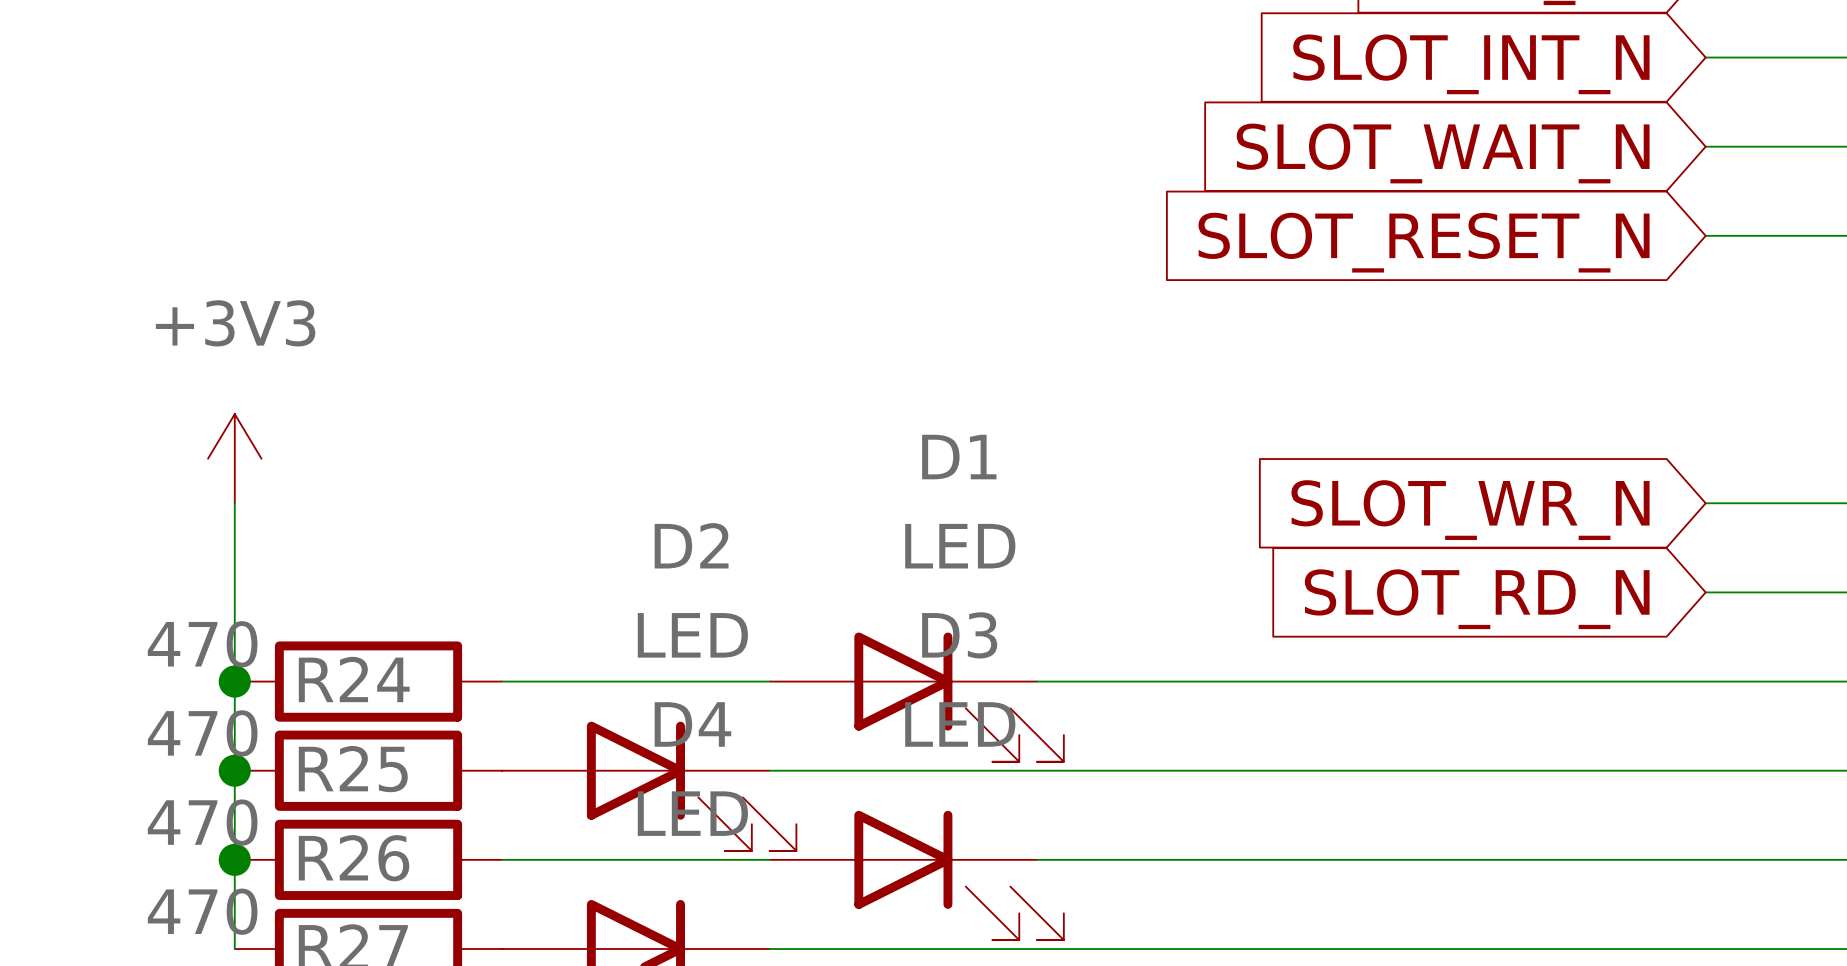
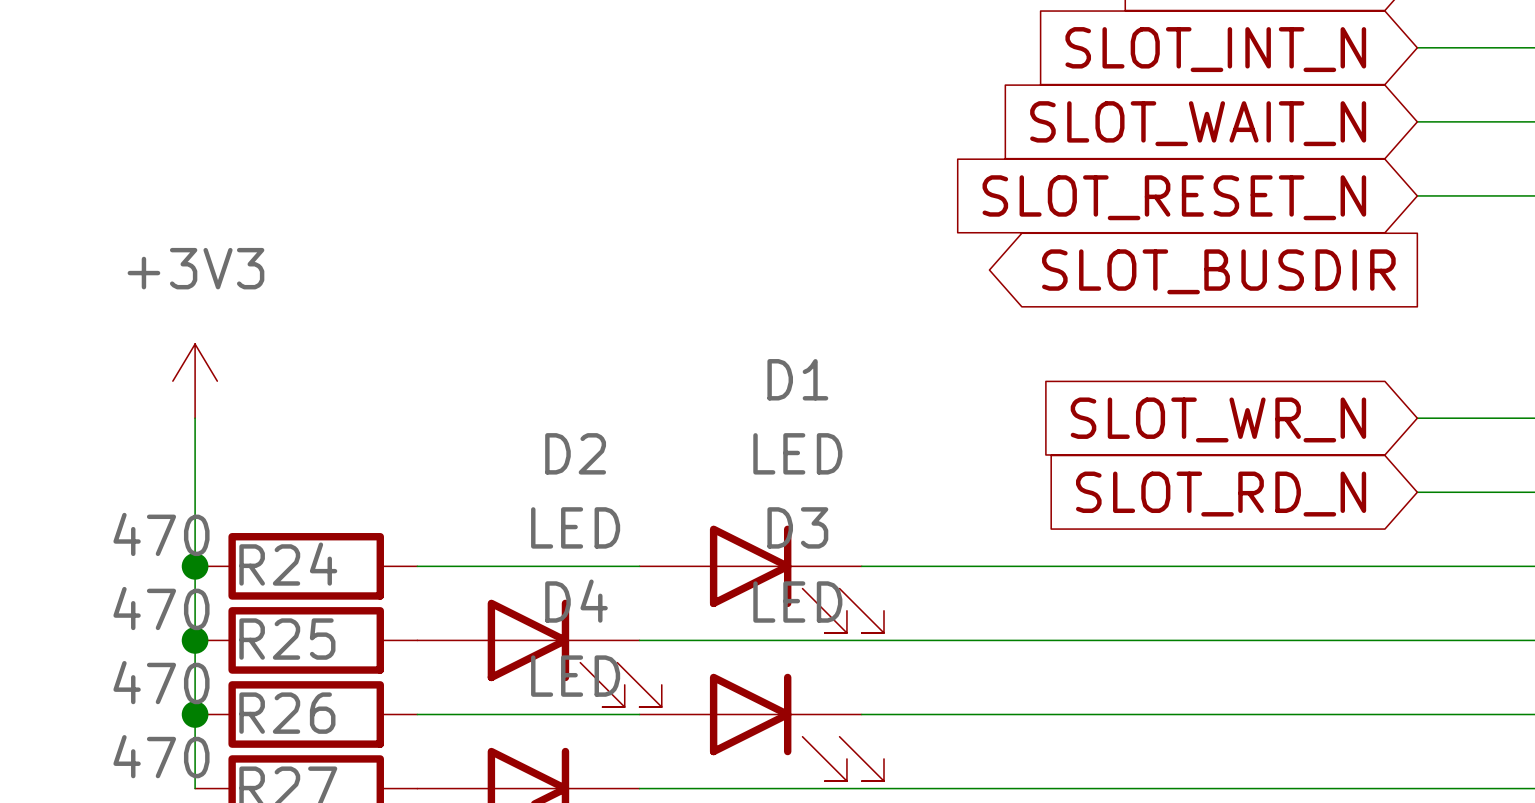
global label: none -> SLOT_BUSDIR (1218, 271)

